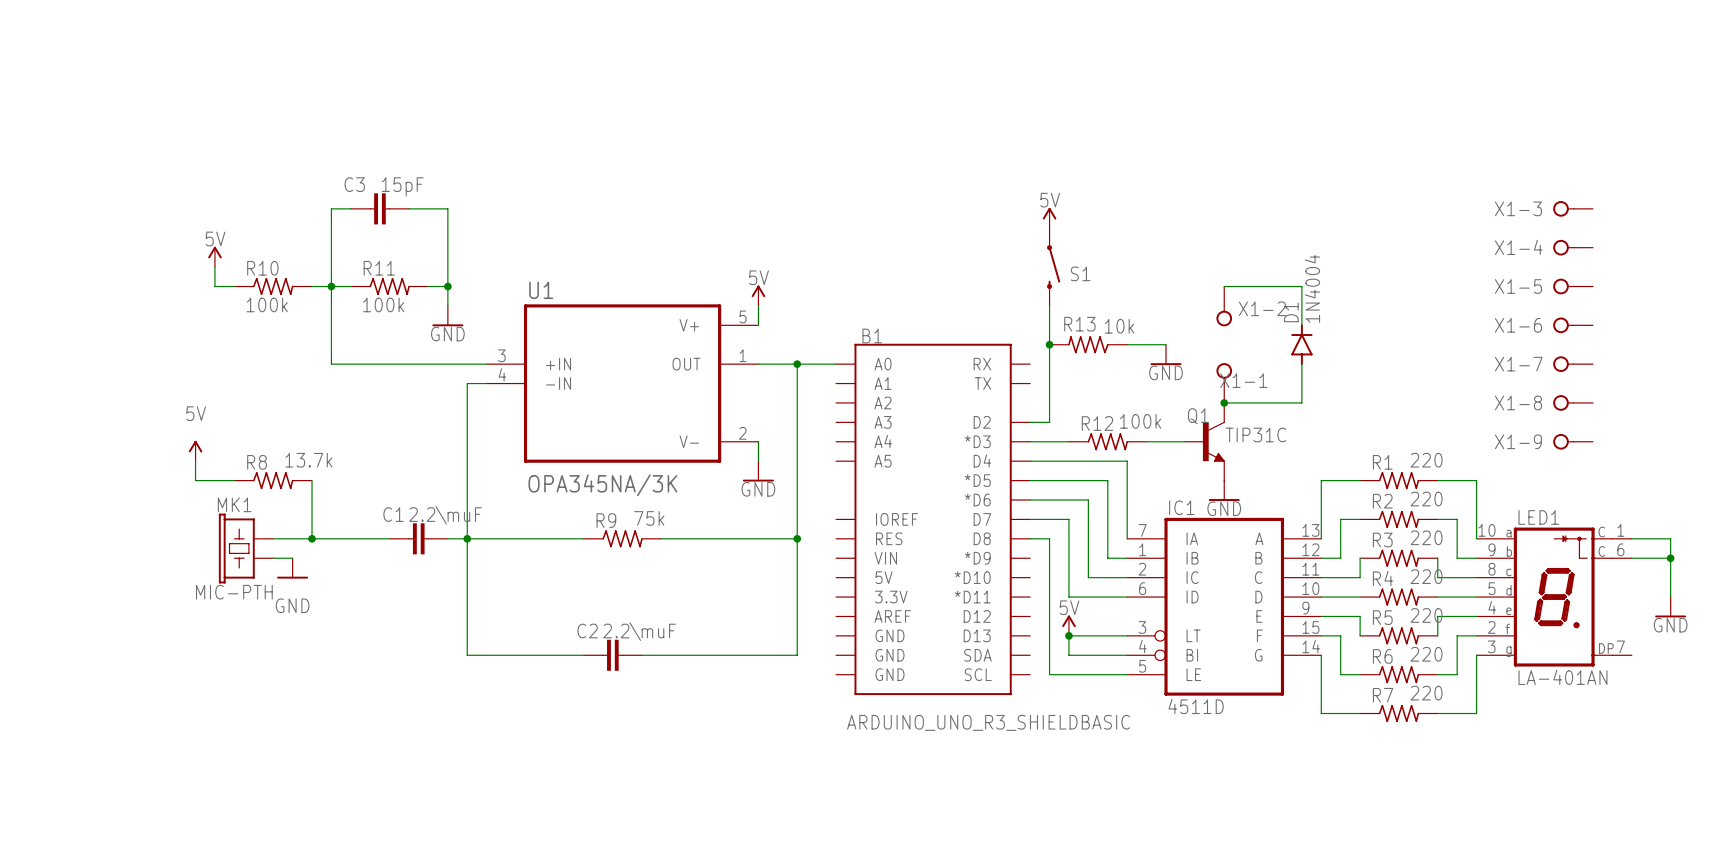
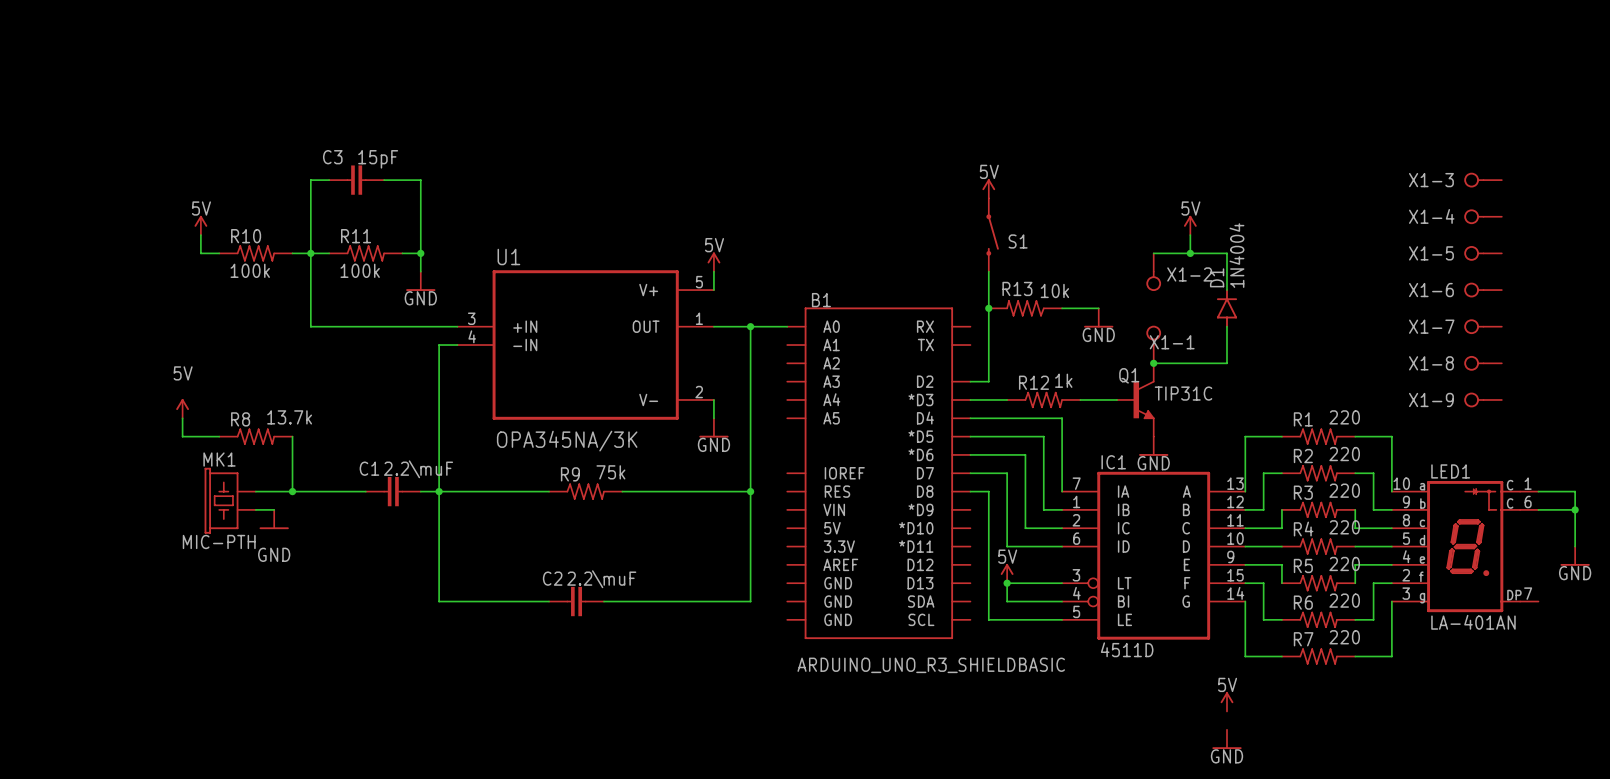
power symbol: none -> 5V (1190, 225)
wire: none -> (1190, 235) (1190, 253)
junction: none -> (1190, 253)
R12 value: 100k (1140, 421) -> 1k (1063, 380)
power symbol: none -> 5V (1226, 701)
power symbol: none -> GND (1226, 739)

